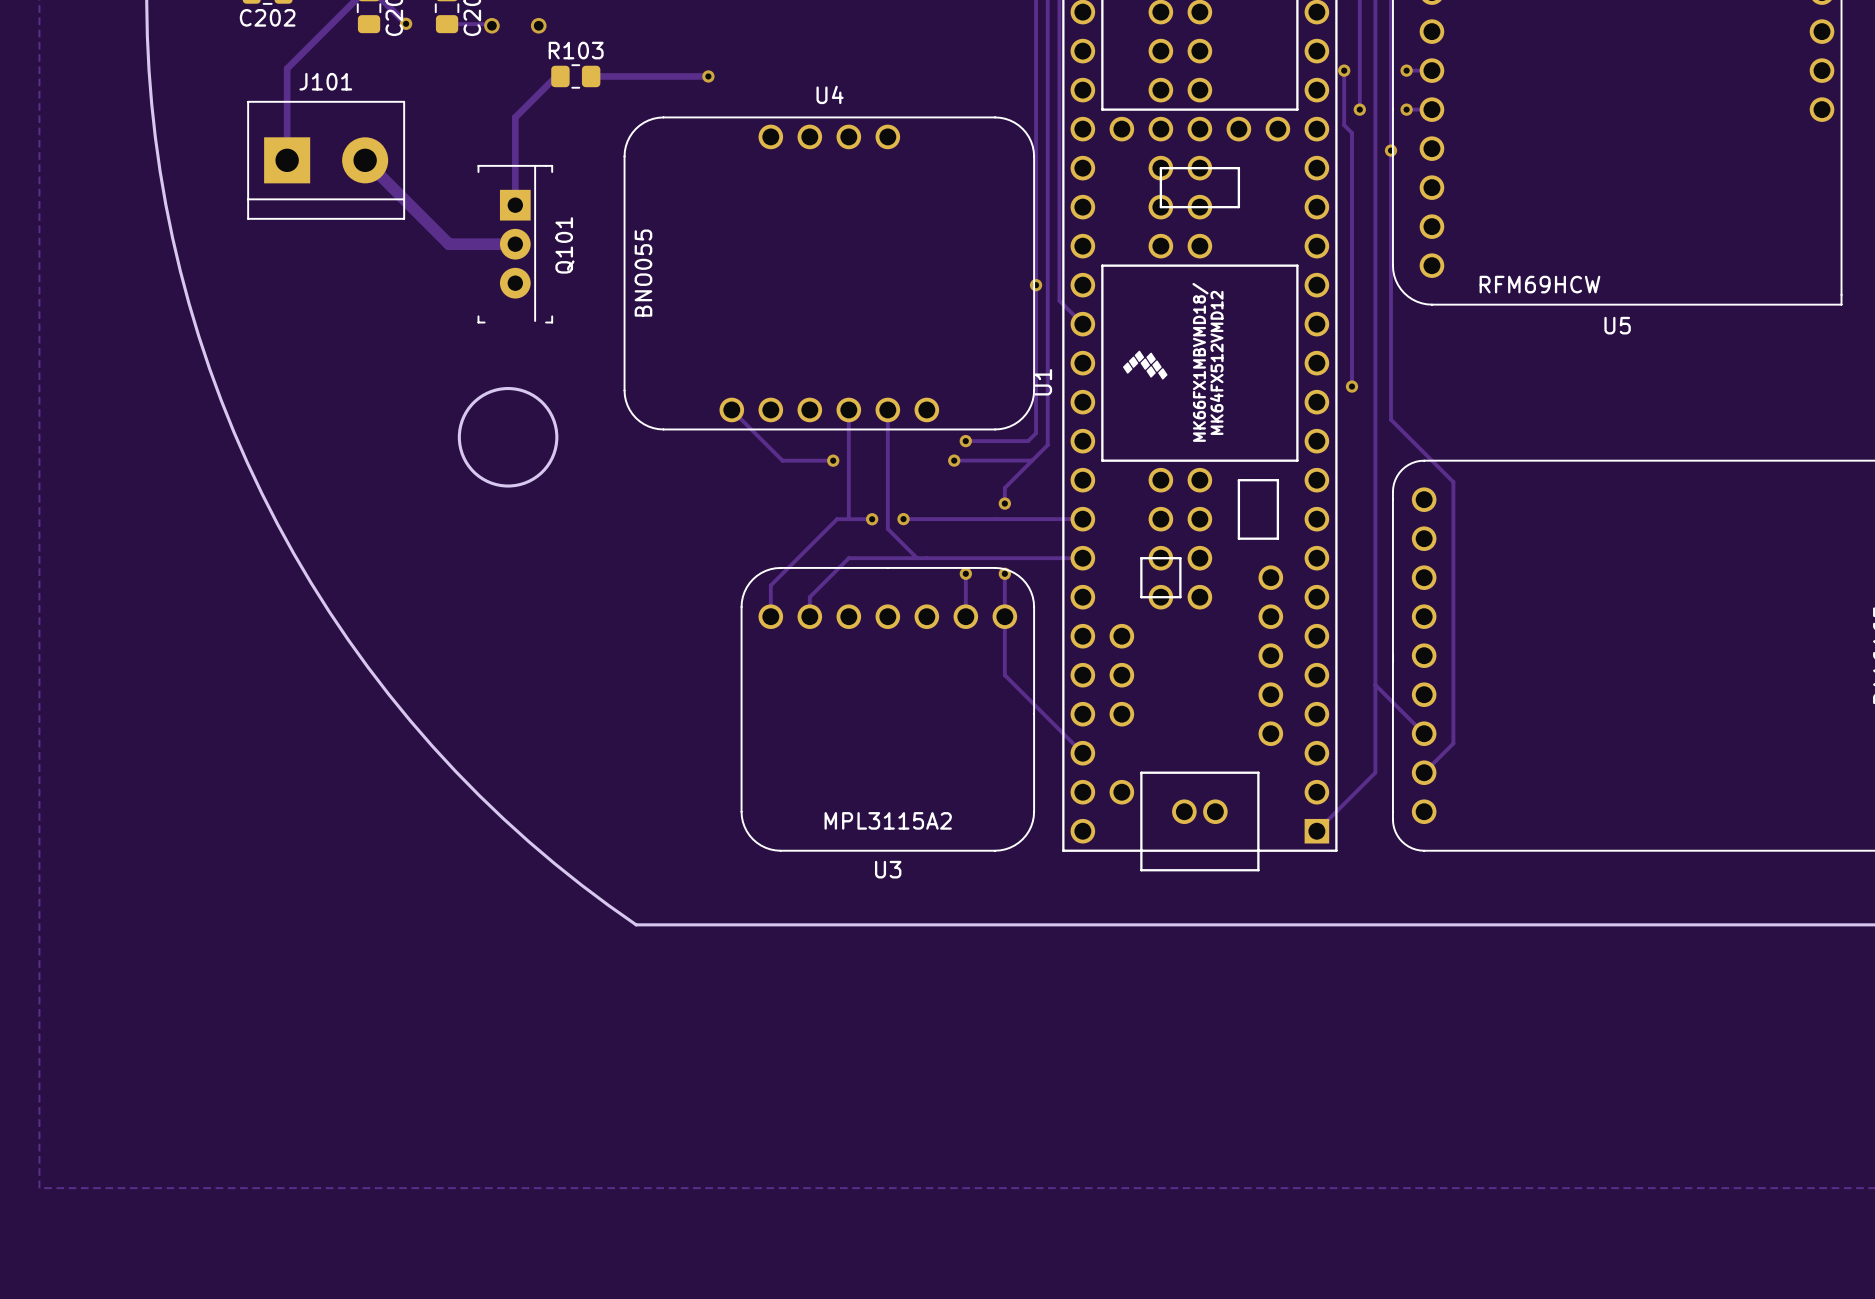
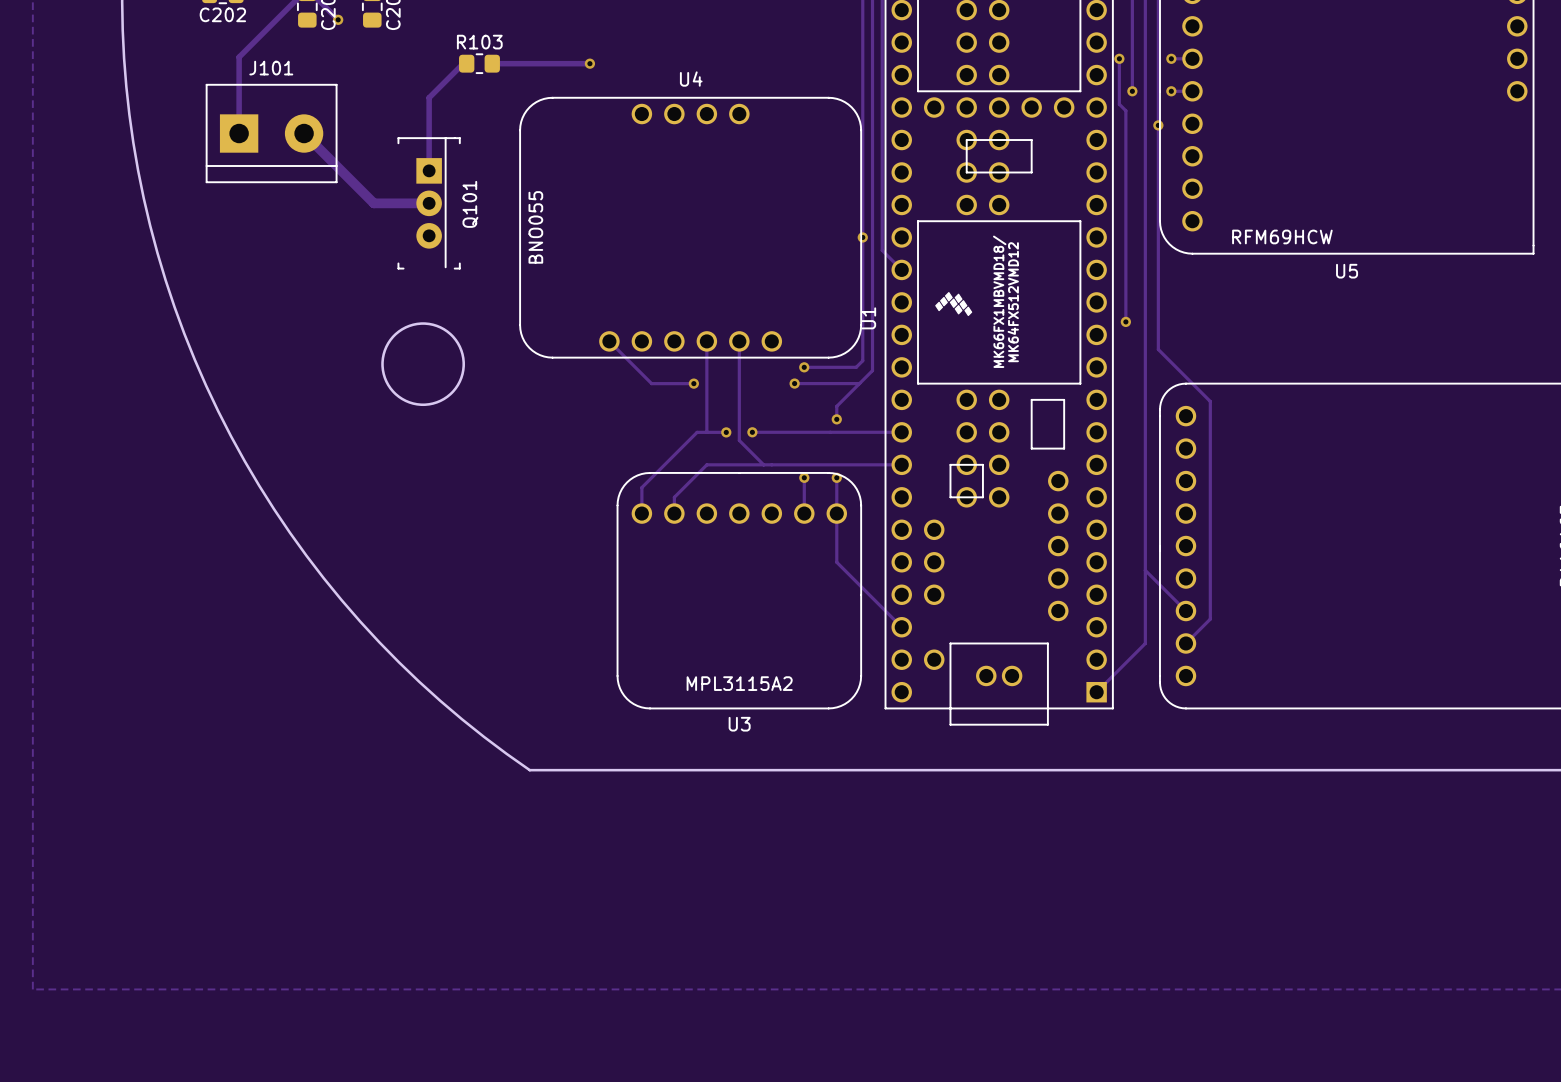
track: (447, 24) (490, 24) (491, 25) -> none
via: (491, 25) -> none
via: (538, 25) -> none

